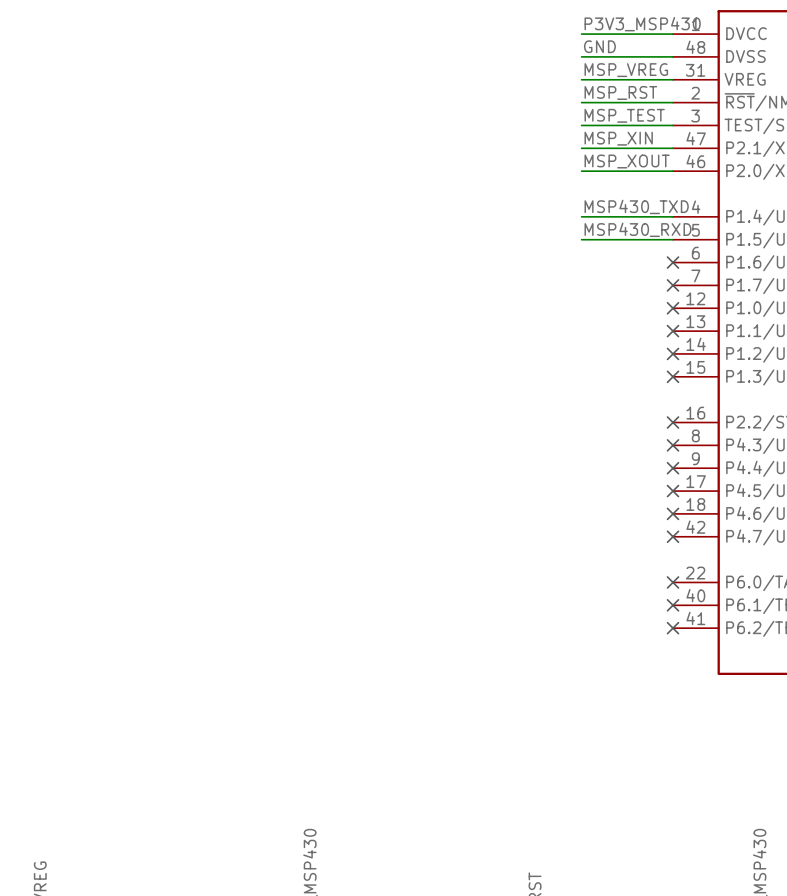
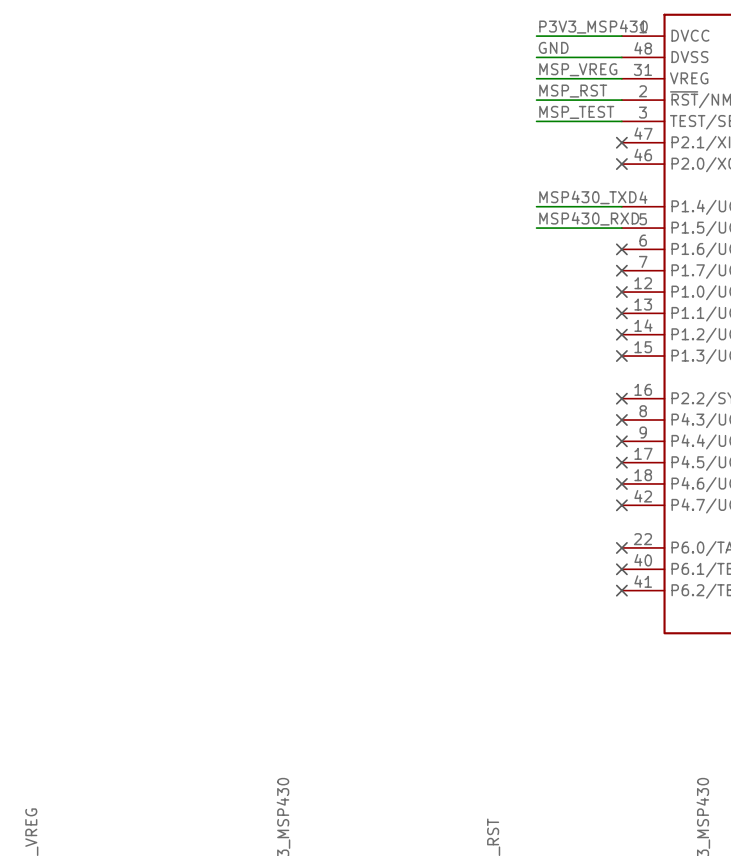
label: MSP_XIN (618, 138) -> none
wire: (581, 148) (673, 148) -> none
no-connect mark: none -> (621, 142)
label: MSP_XOUT (627, 161) -> none
wire: (581, 171) (673, 171) -> none
no-connect mark: none -> (621, 164)

